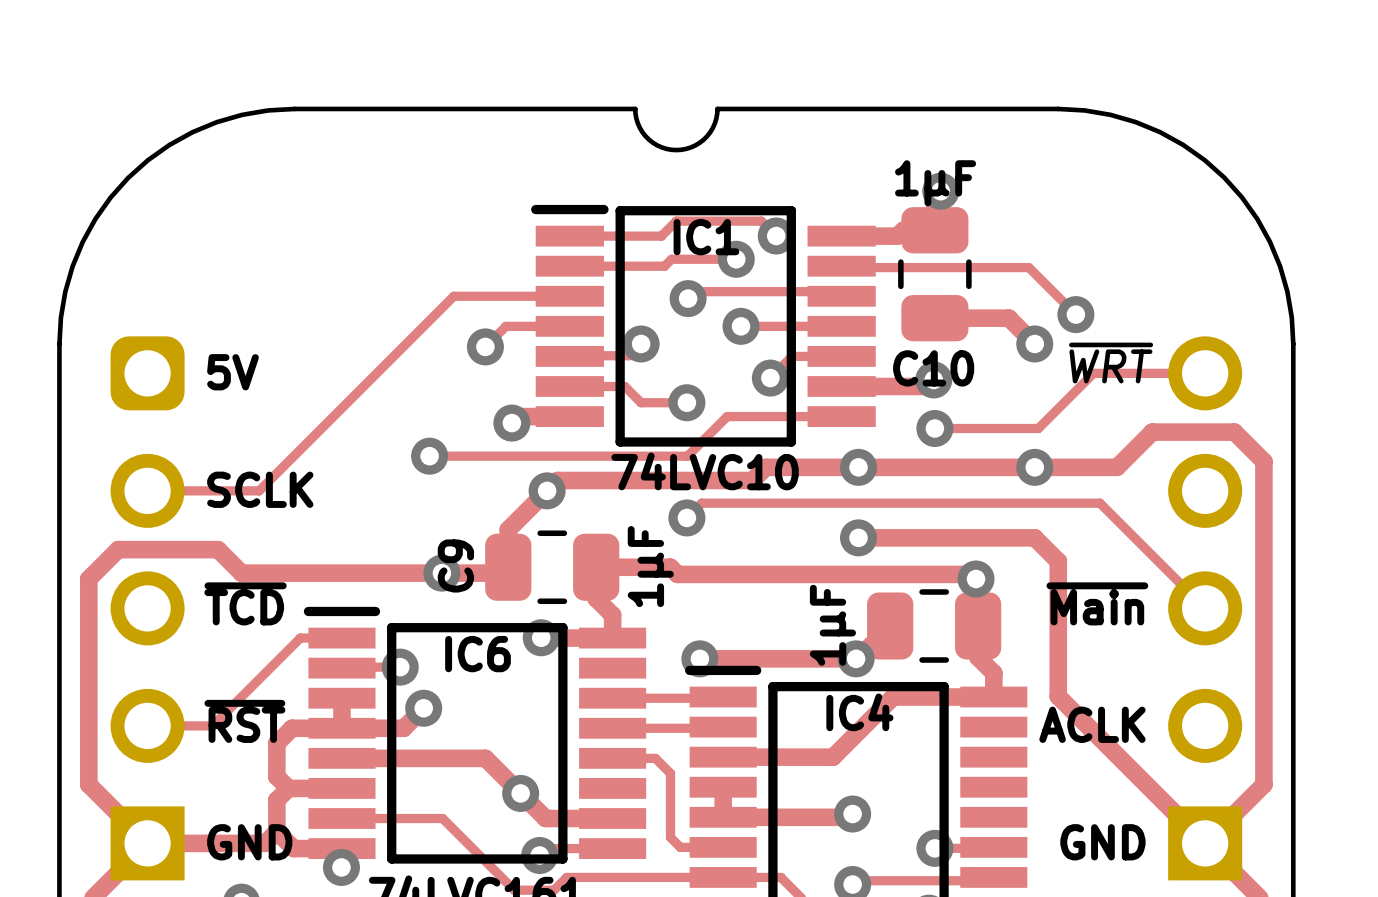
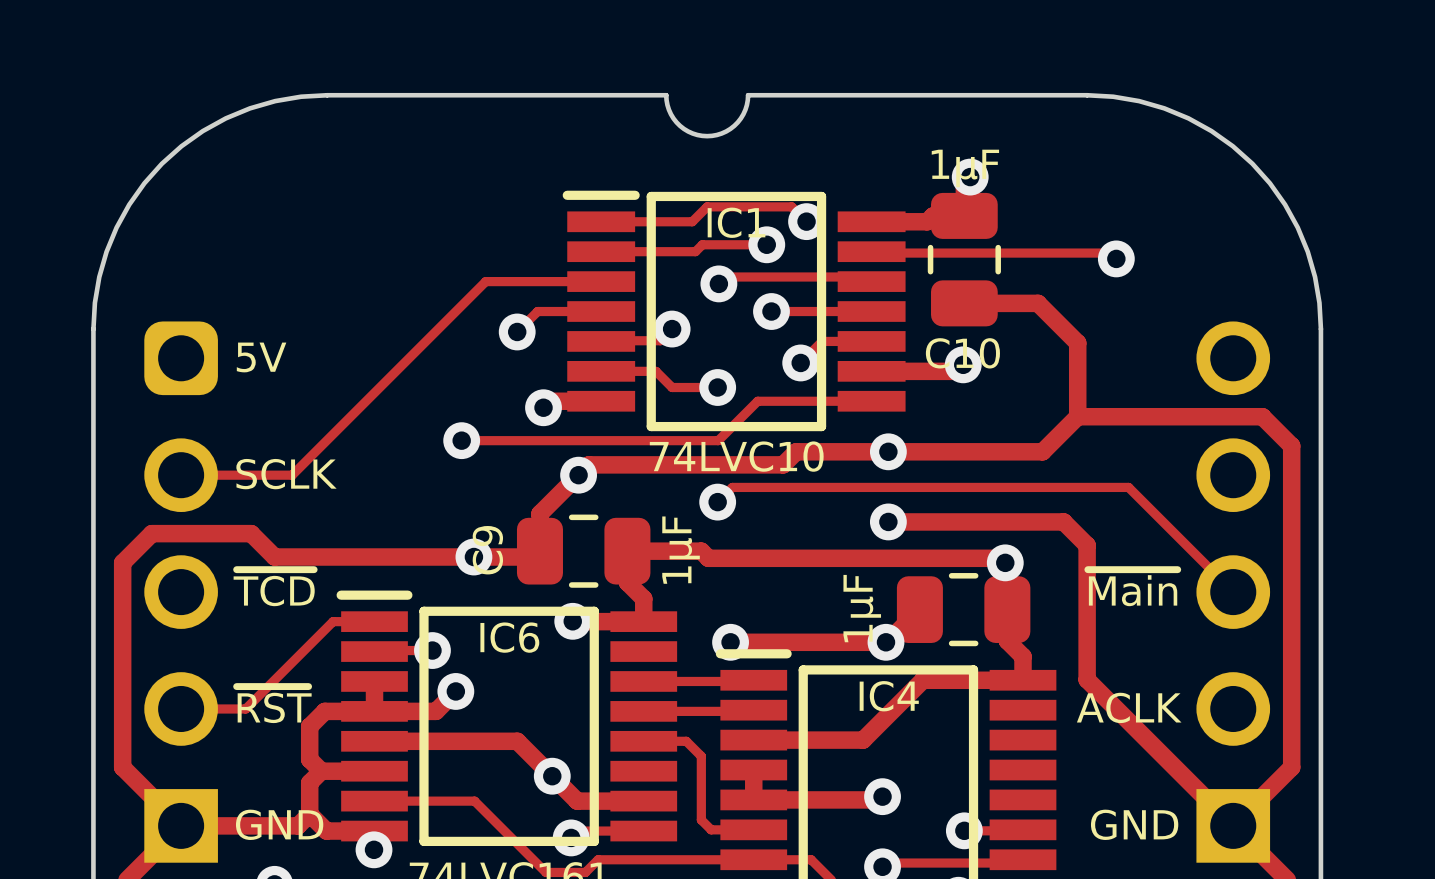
track: (1028, 267) (1075, 314) -> (1057, 253) (1110, 253) (1116, 258)
via position: (1075, 314) -> (1116, 258)
track: none -> (1063, 329) (1077, 343) (1077, 416)
via: (1034, 343) -> none
text: ~{WRT} (1111, 363) -> none
track: (1205, 373) (1093, 373) (1038, 428) (934, 428) -> none
via: (934, 428) -> none
track: none -> (1077, 416) (1042, 451)
track: (1152, 432) (1117, 467) (1013, 467) -> (1180, 416) (1077, 416)
via: (1034, 467) -> none

